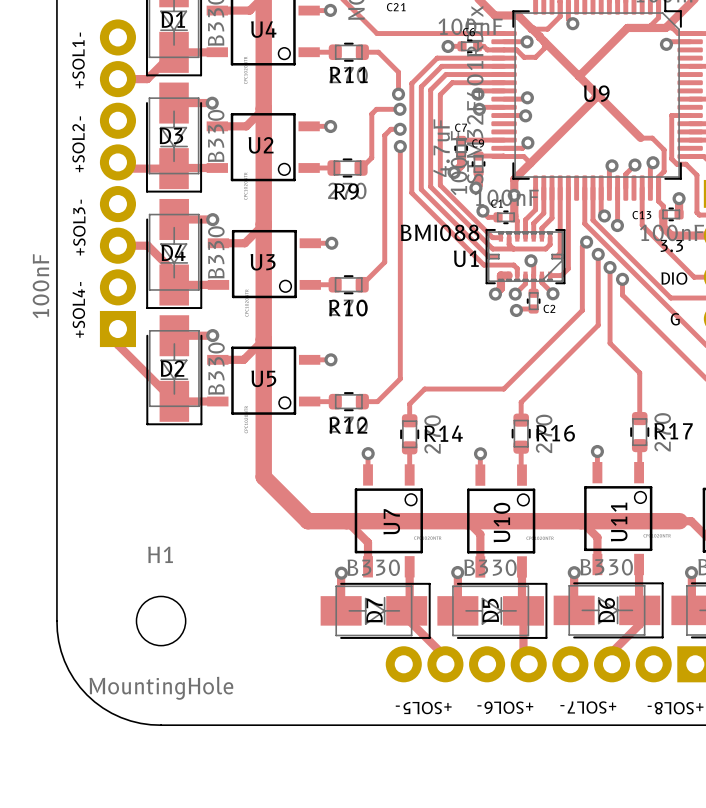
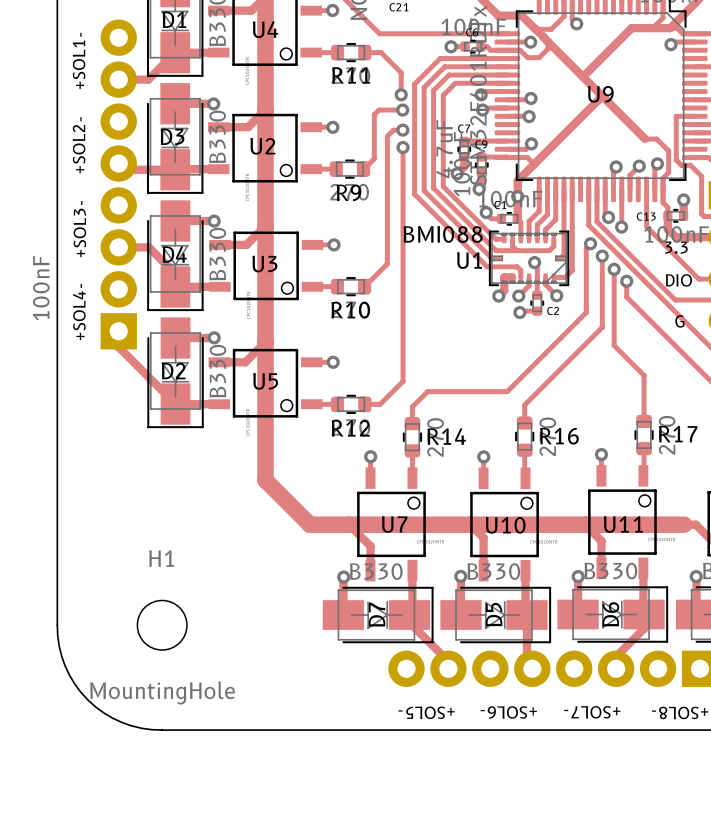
U7 name rotation: 0° (391, 521) -> 90° clockwise (394, 524)
U10 name rotation: 0° (501, 522) -> 90° clockwise (505, 525)
U11 name rotation: 0° (619, 522) -> 90° clockwise (623, 524)

